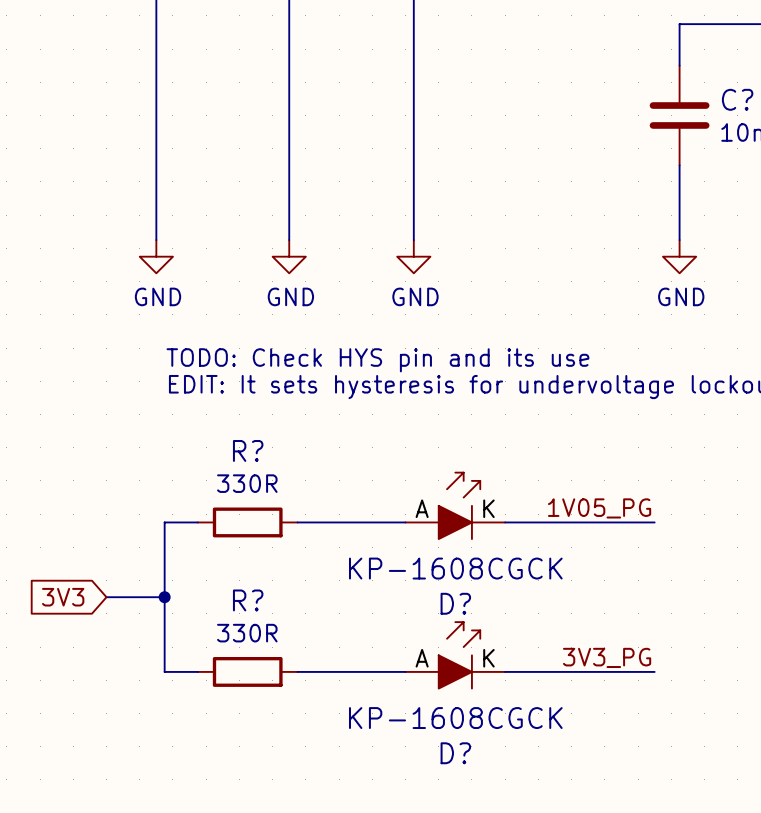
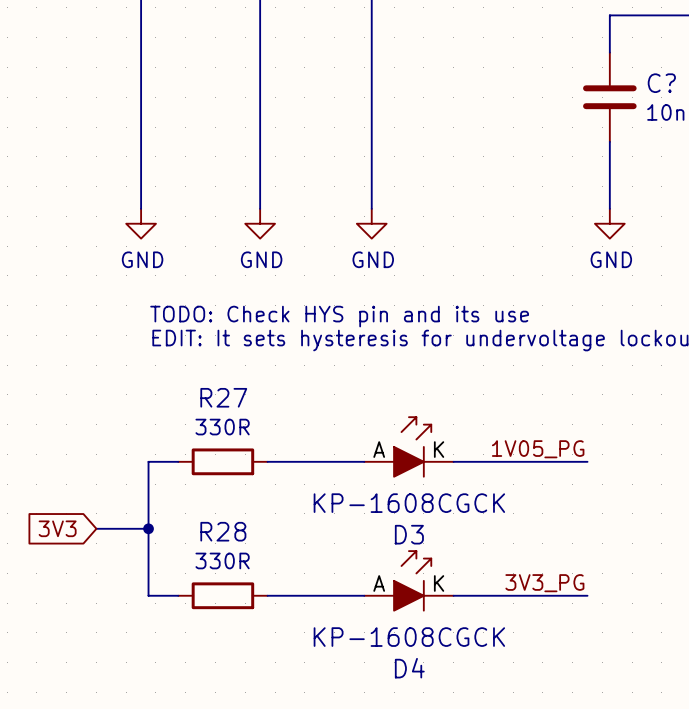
R? name: R? (248, 450) -> R27 (223, 397)
R? name: R? (248, 600) -> R28 (223, 531)
D? name: D? (455, 603) -> D3 (409, 534)
D? name: D? (455, 753) -> D4 (409, 668)

